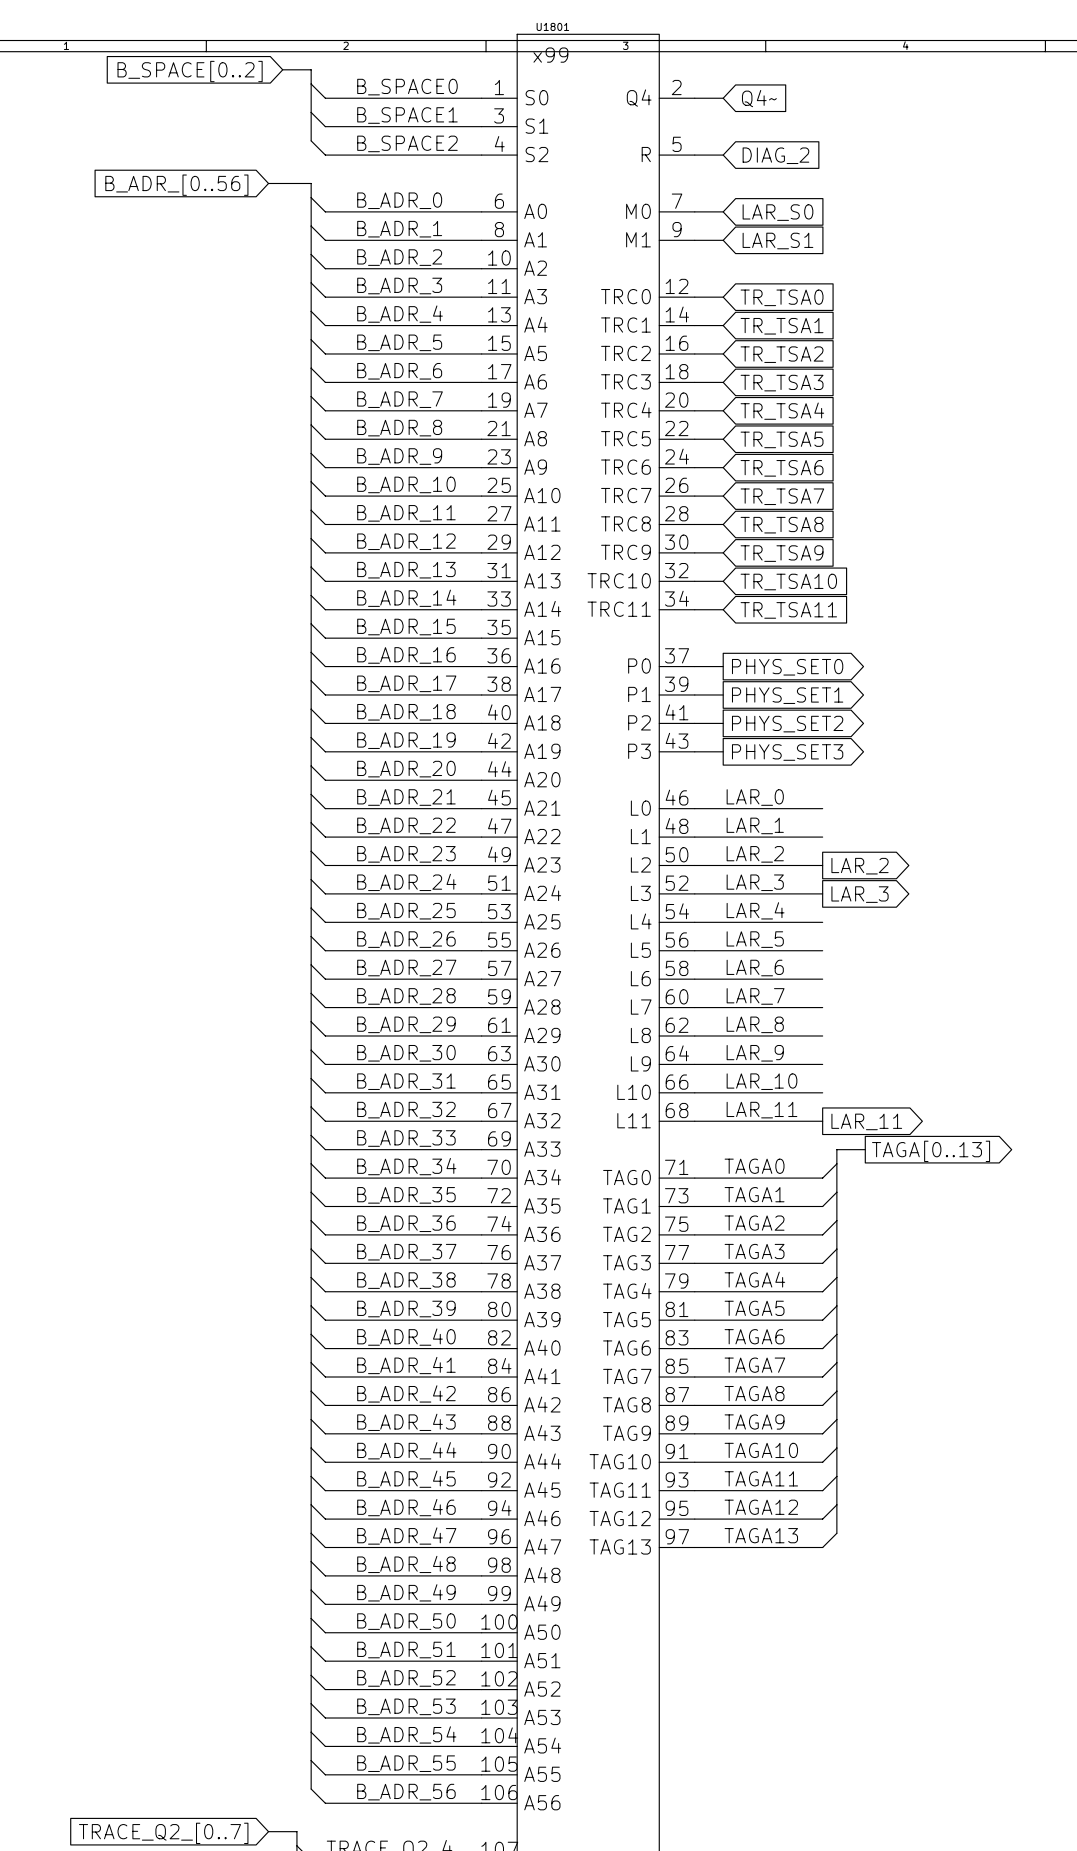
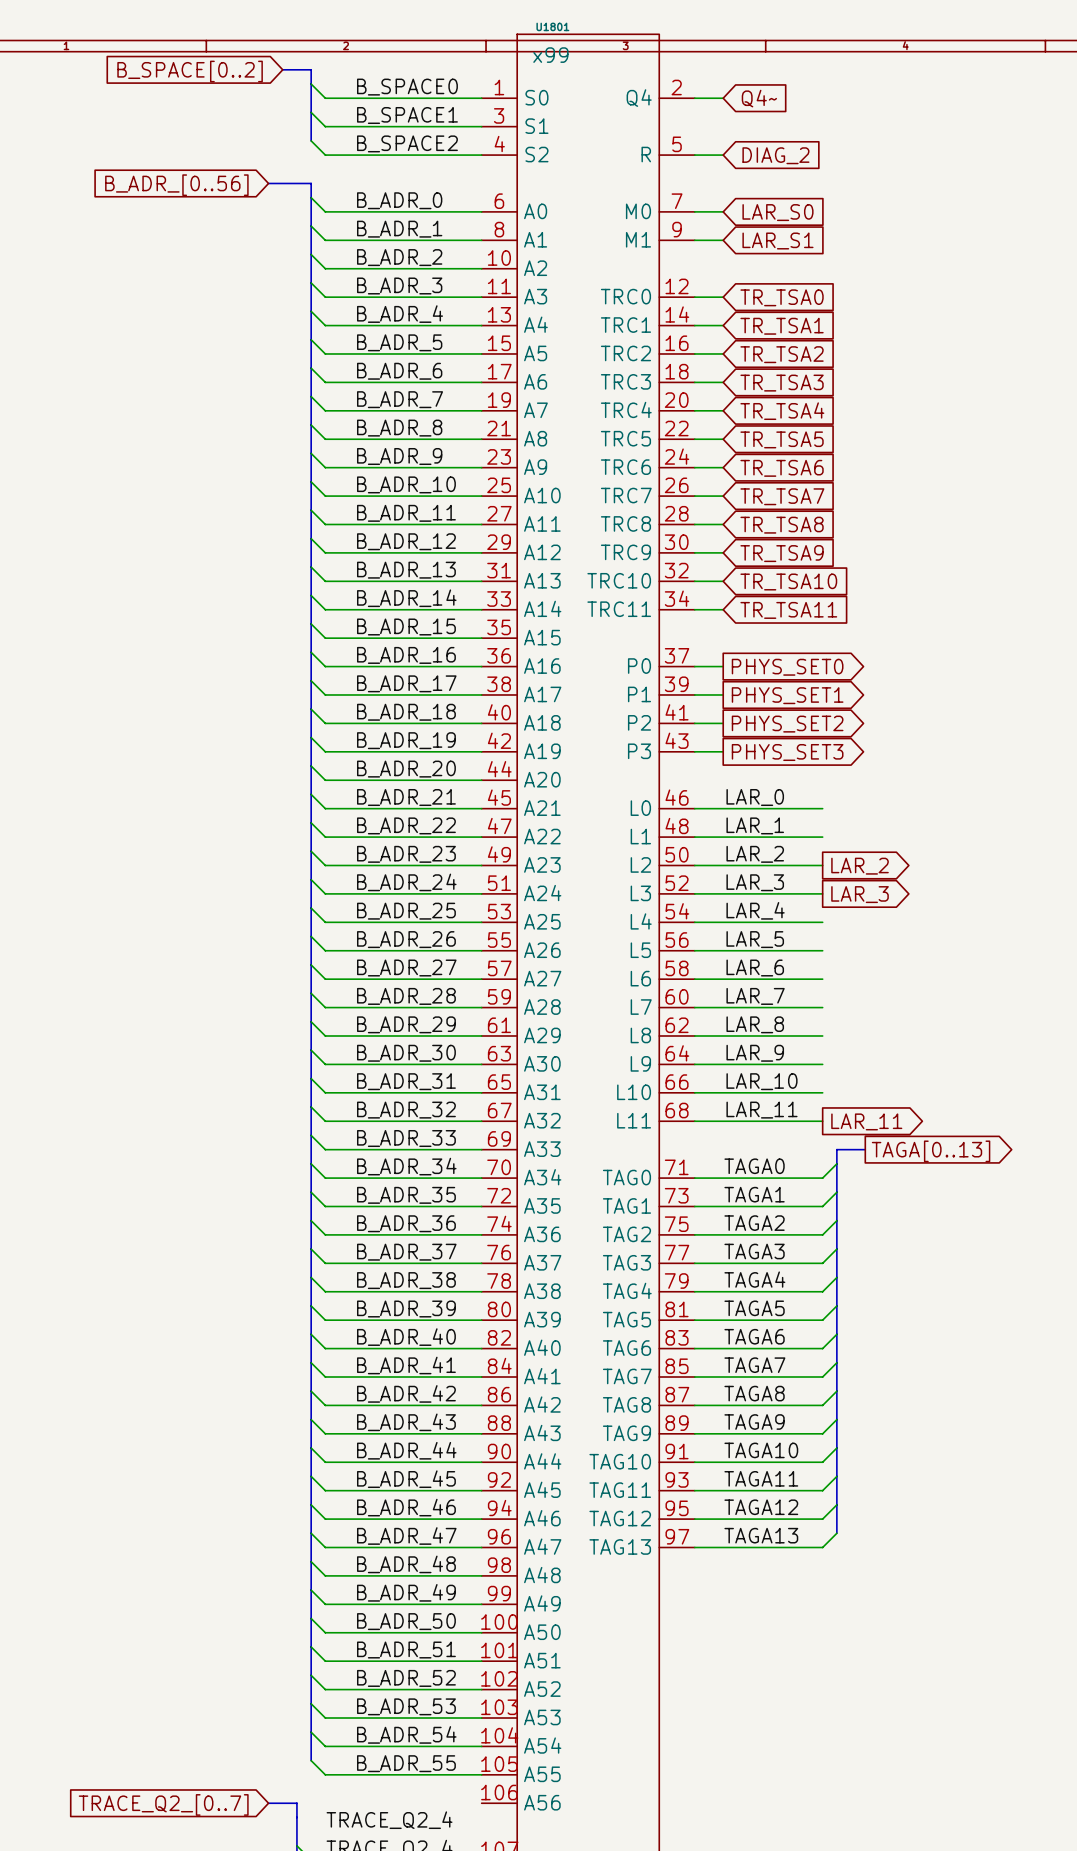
bus: (311, 1760) (311, 1789) -> none
wire: (311, 1789) (325, 1803) (481, 1803) -> none
label: B_ADR_56 (406, 1792) -> none
label: none -> TRACE_Q2_4 (389, 1820)
bus: (268, 1831) (296, 1831) -> (268, 1803) (296, 1803) (296, 1831)
global label position: TRACE_Q2_[0..7] (163, 1833) -> TRACE_Q2_[0..7] (163, 1804)

